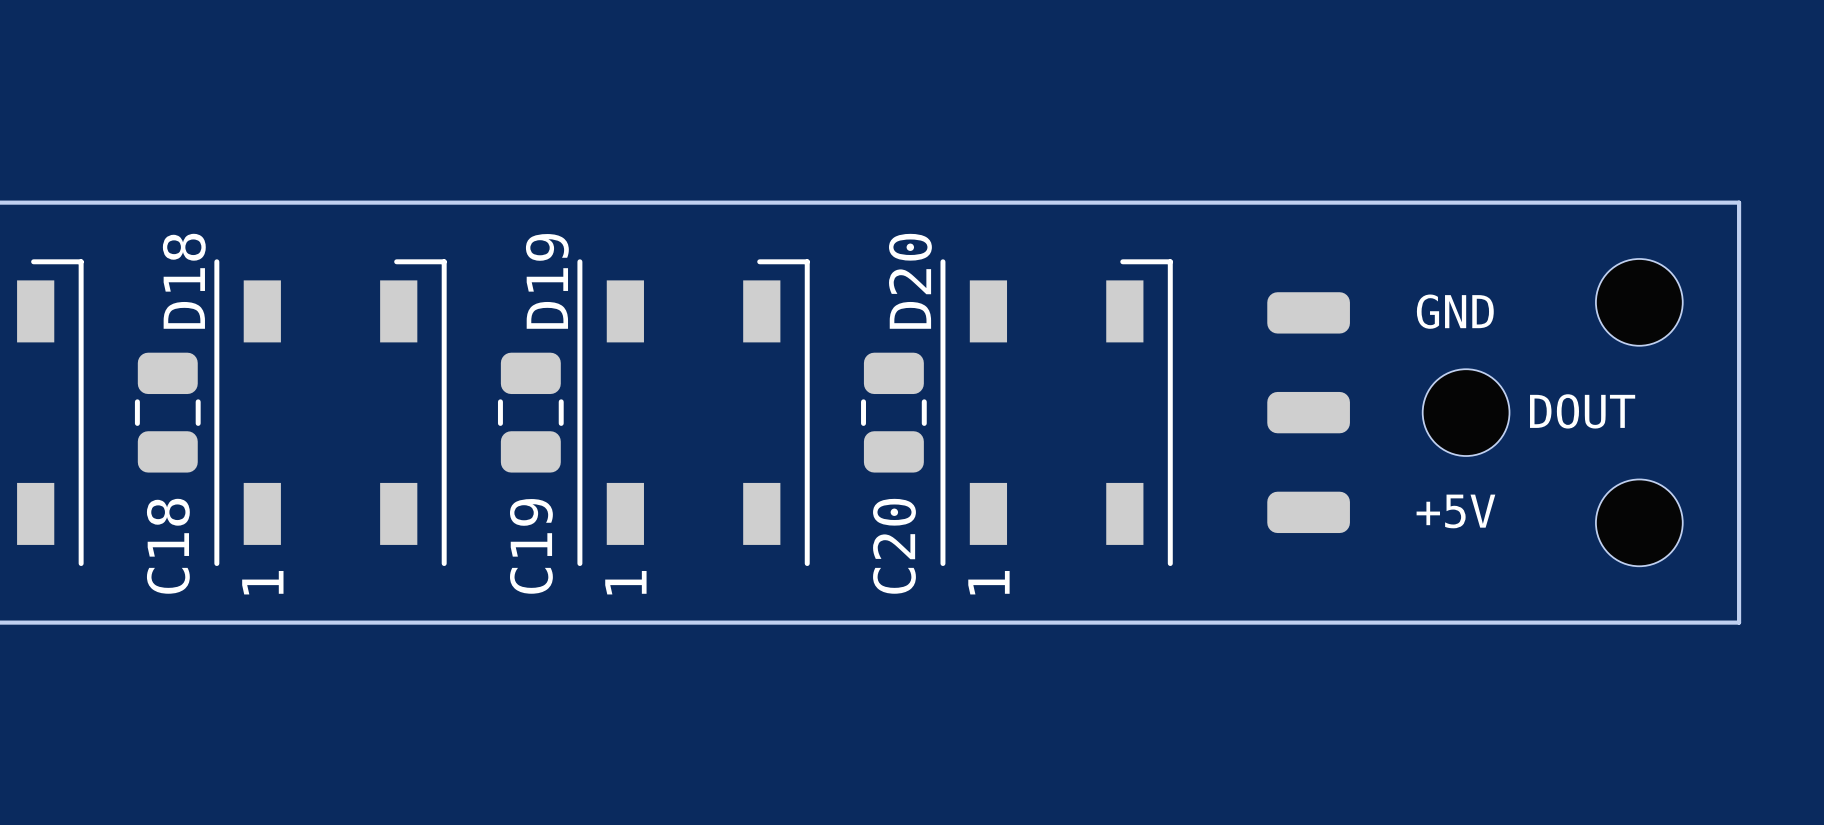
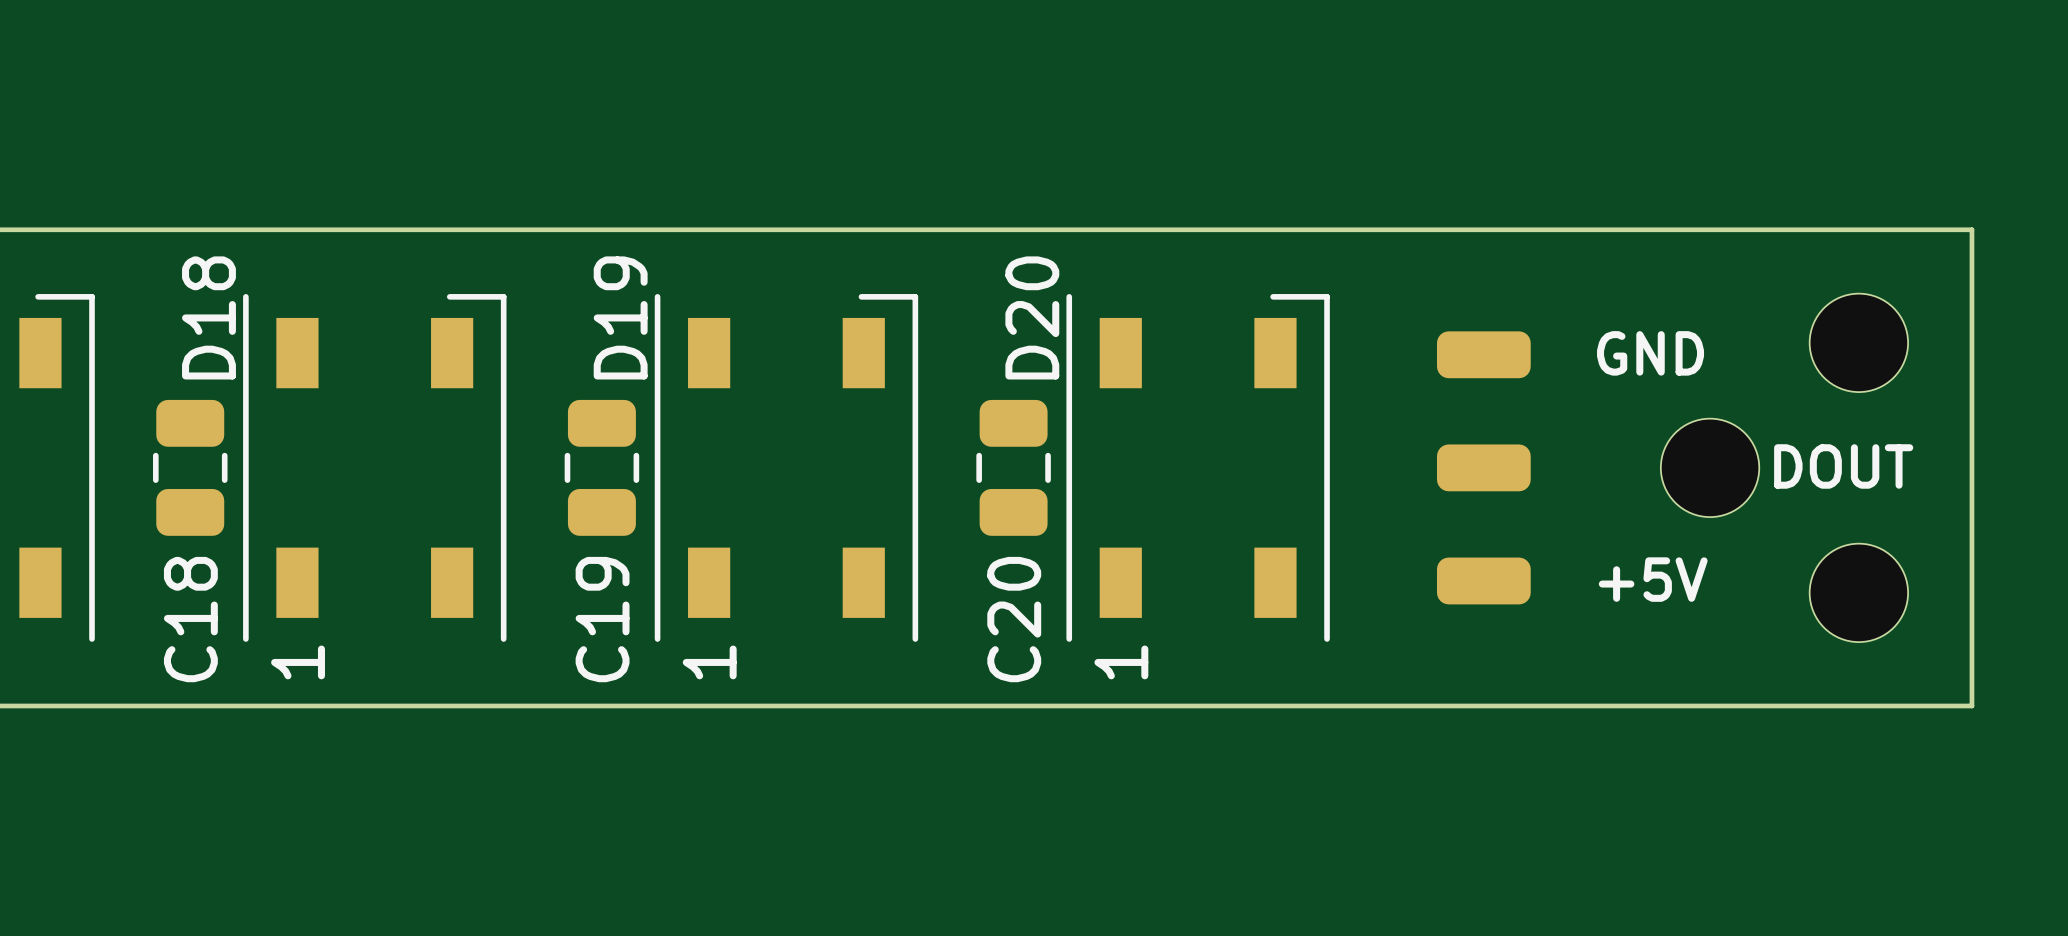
part value position: DOUT (1582, 411) -> DOUT (1843, 466)
part position: (1466, 412) -> (1710, 467)

